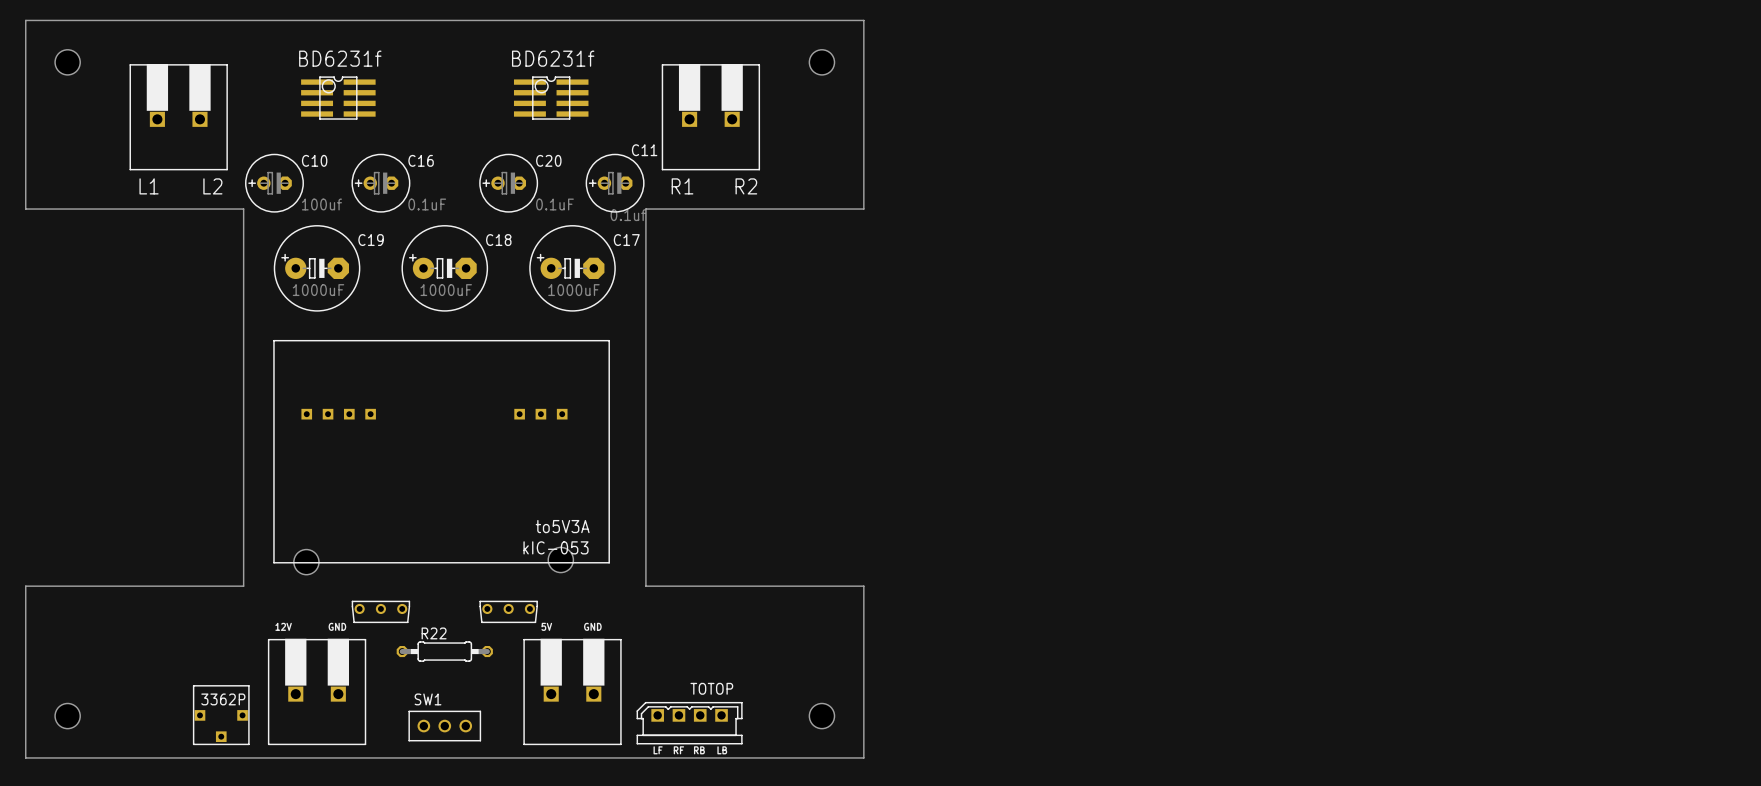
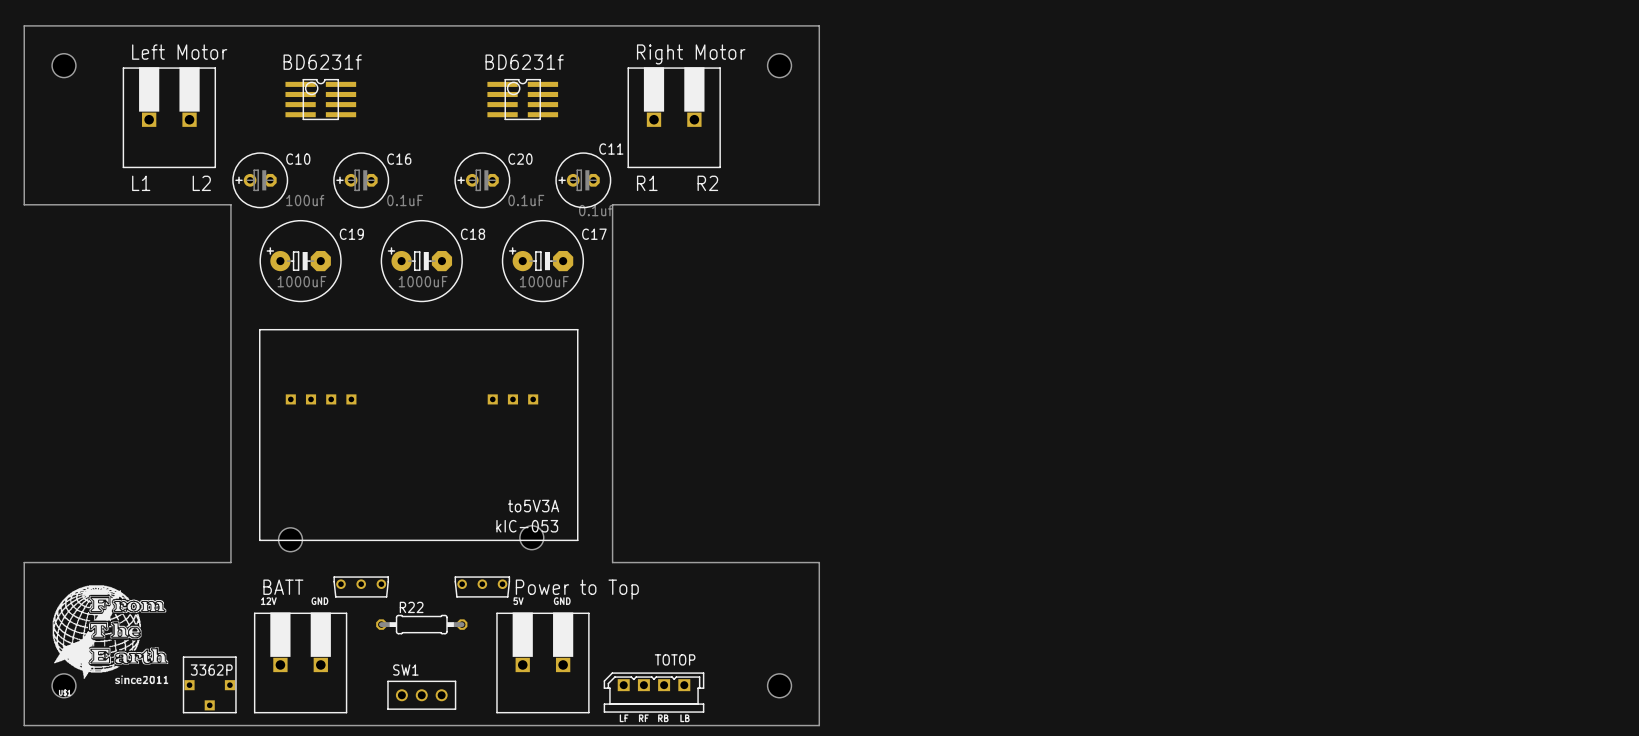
text: none -> Left Motor (179, 52)
text: none -> Right Motor (691, 54)
text: none -> BATT (283, 587)
text: none -> Power to Top (577, 589)
part: none -> (110, 634)

